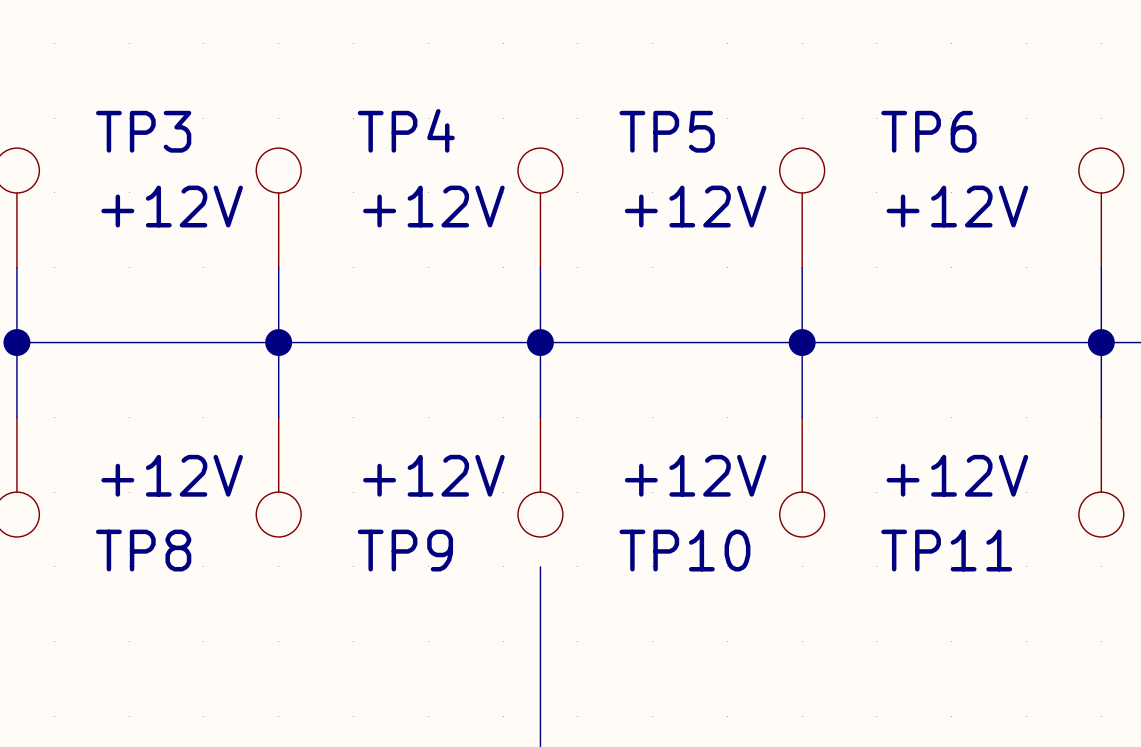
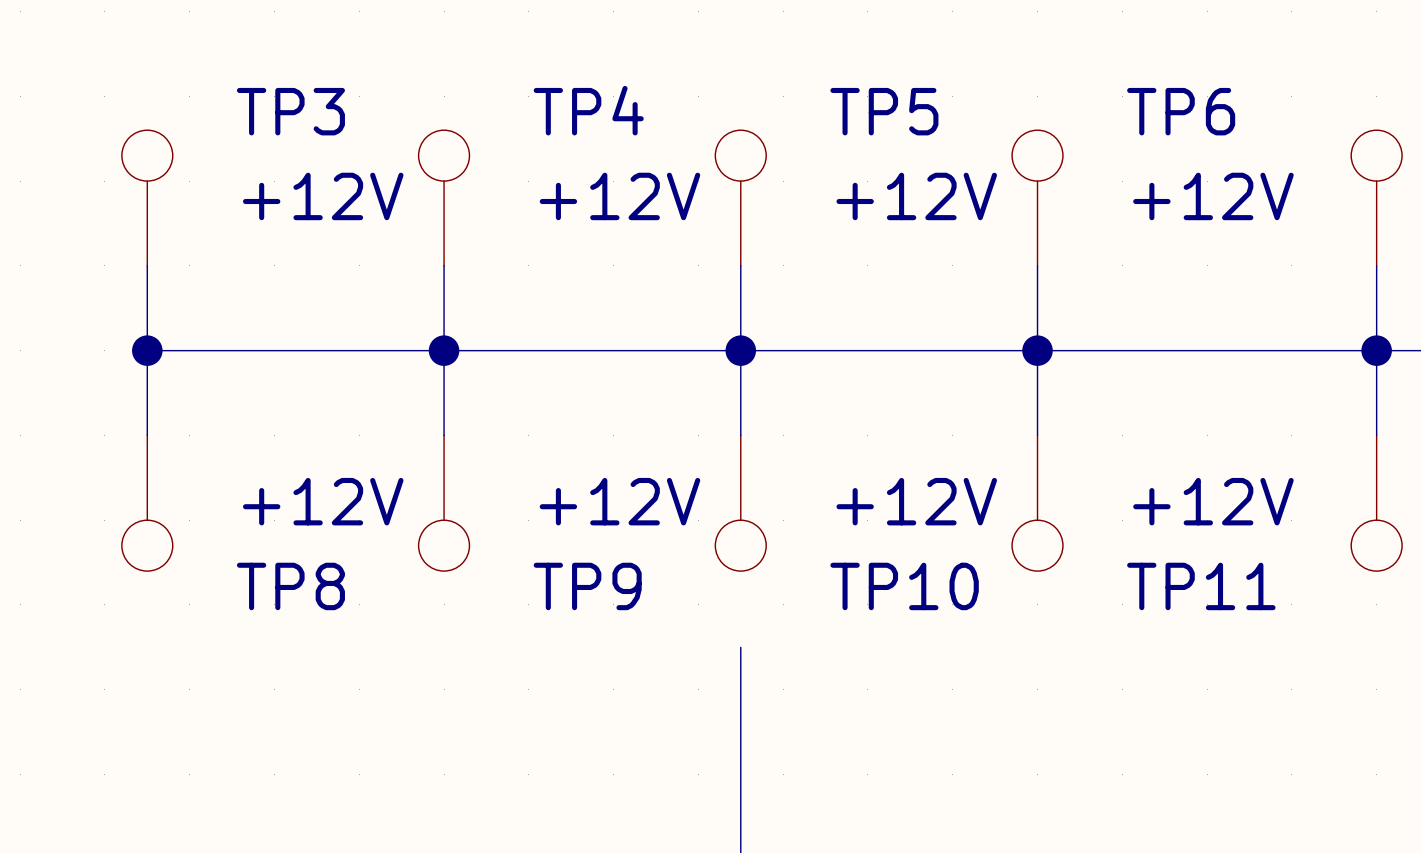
wire: (540, 566) (540, 604) -> none

